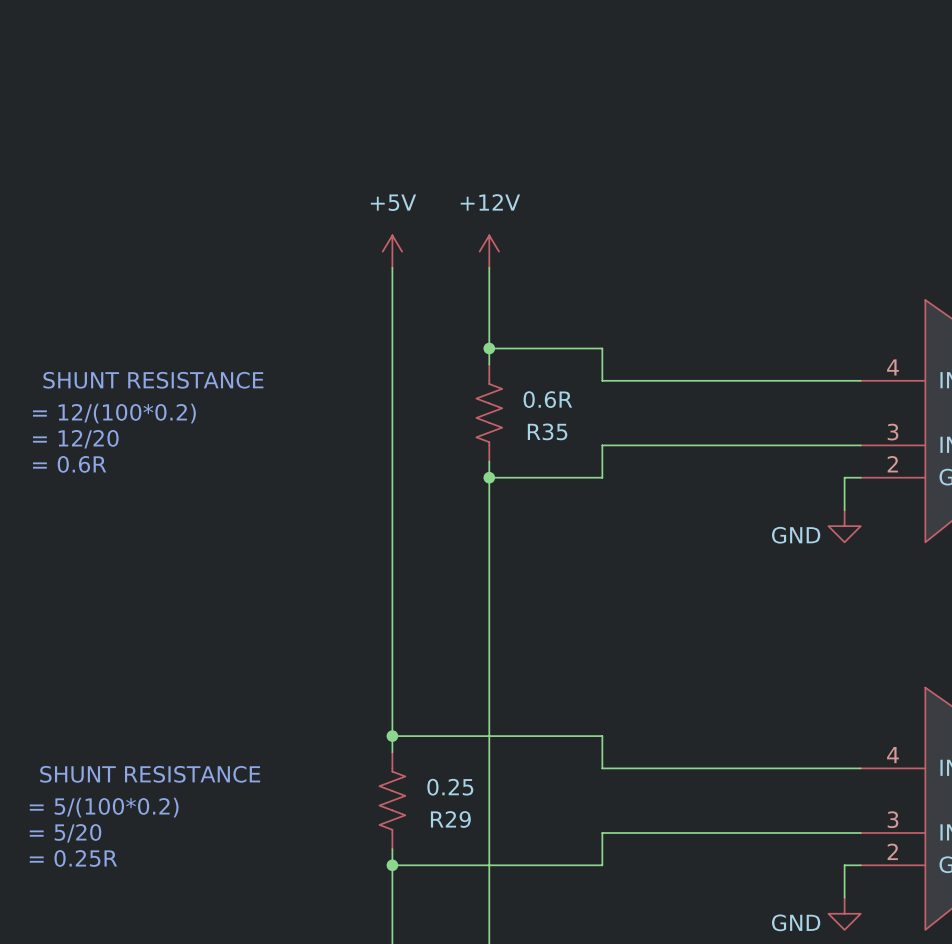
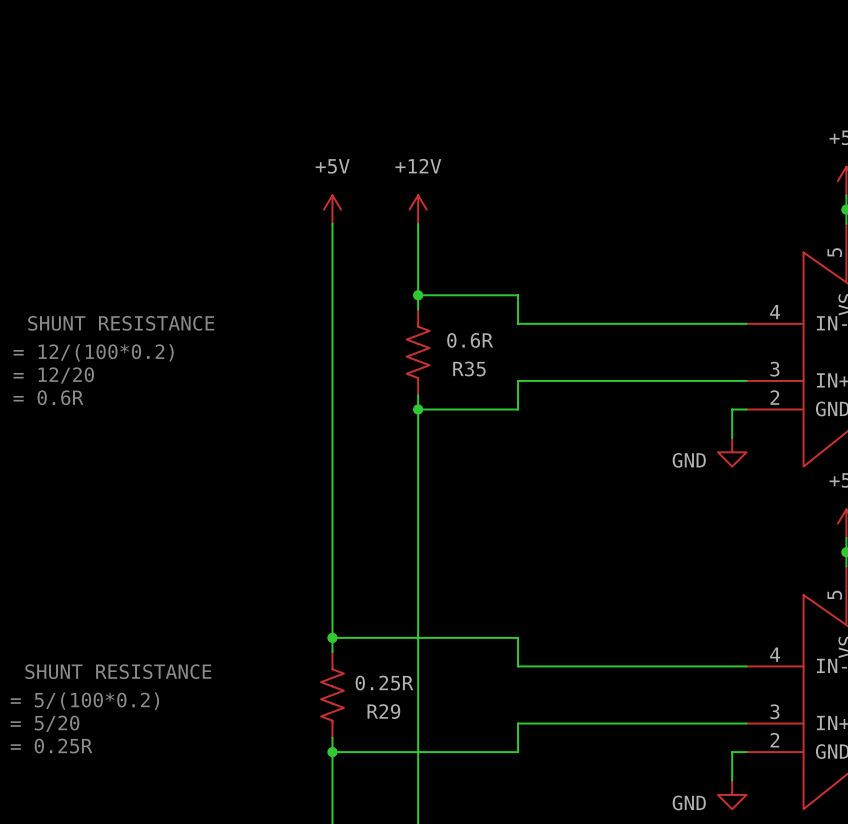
R29 value: 0.25 (450, 787) -> 0.25R (384, 683)

